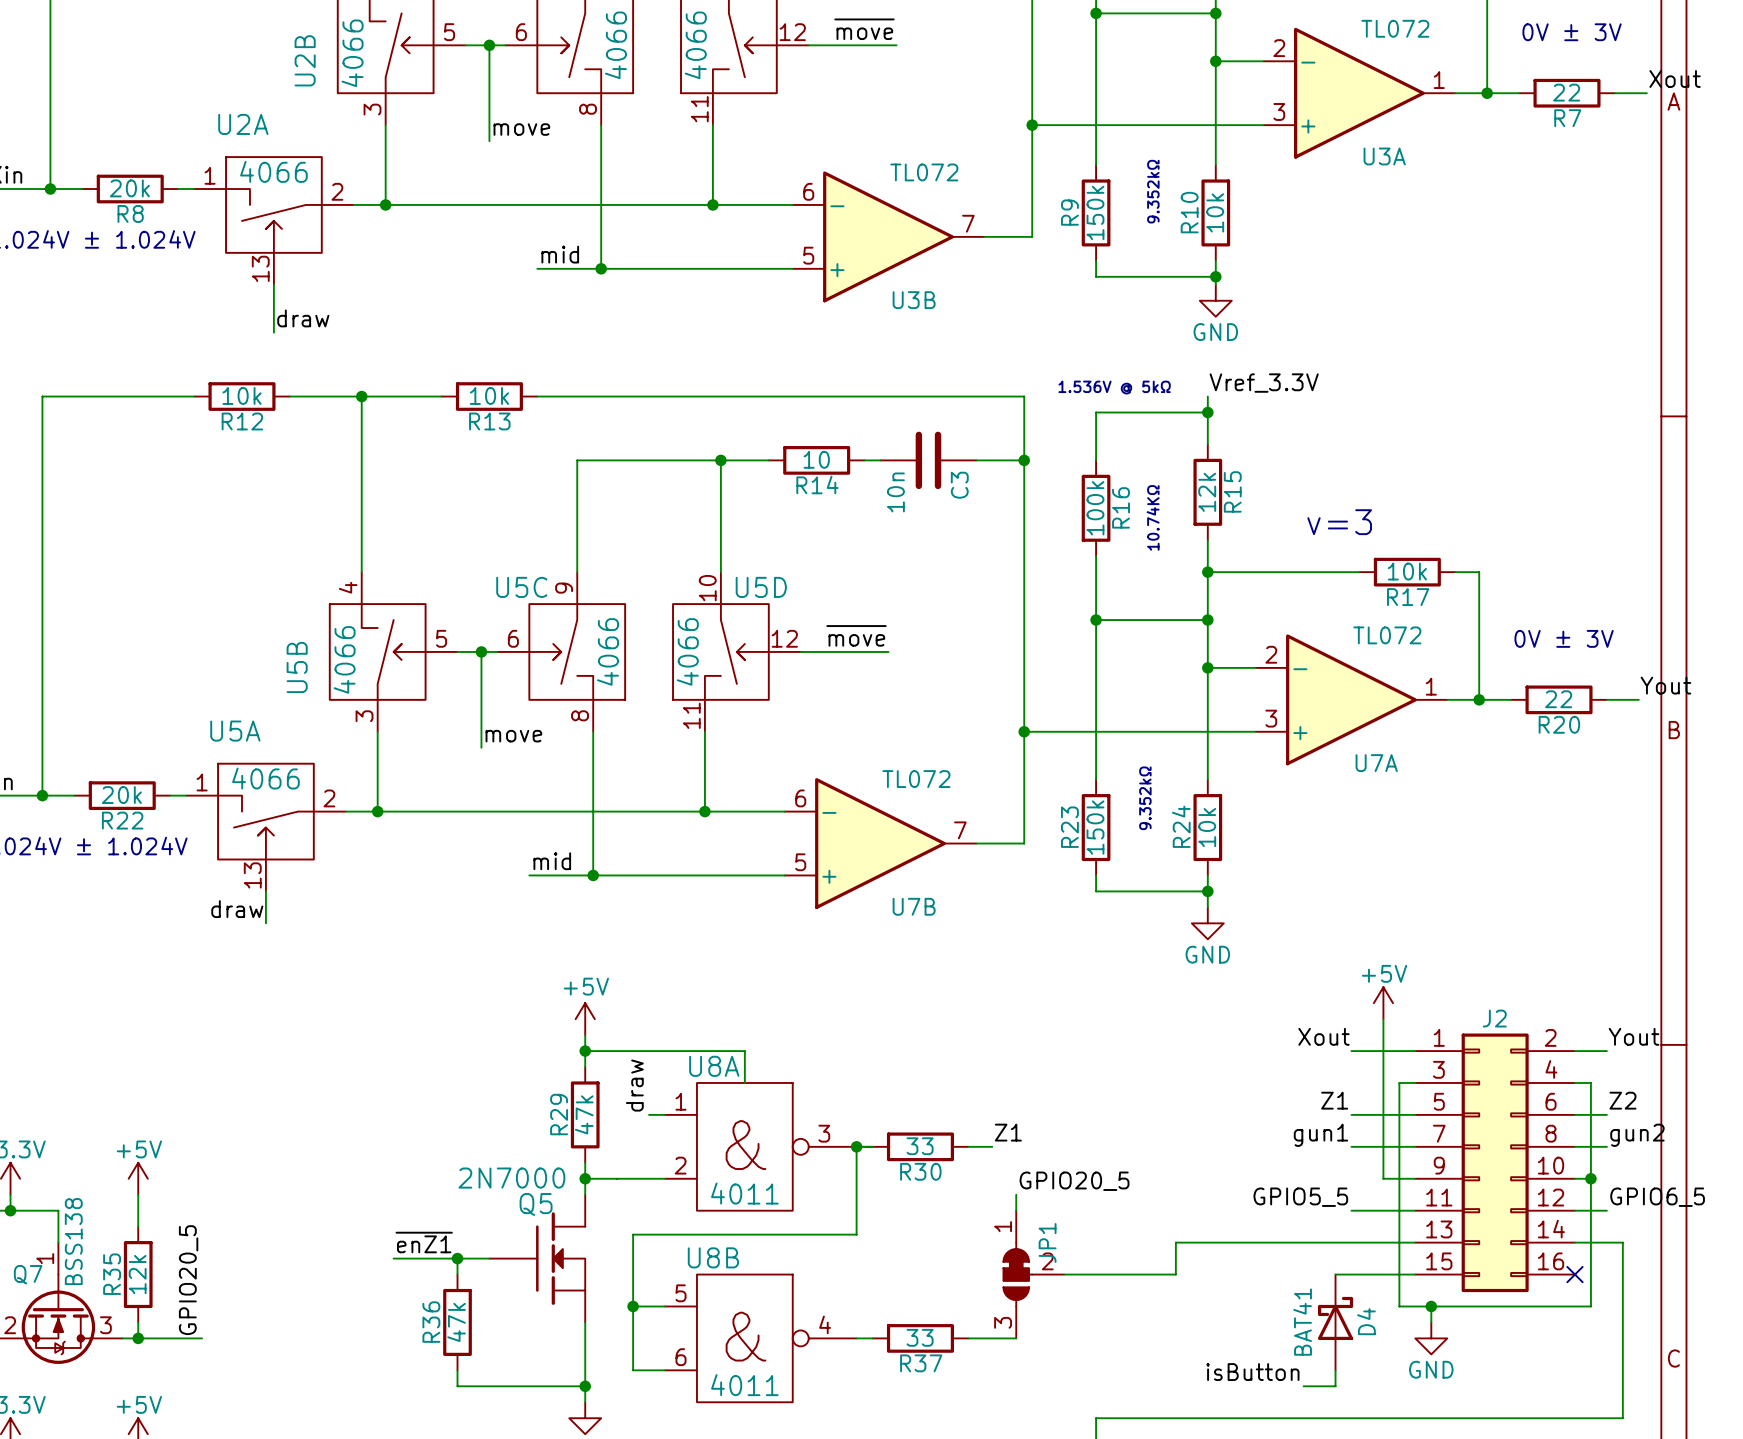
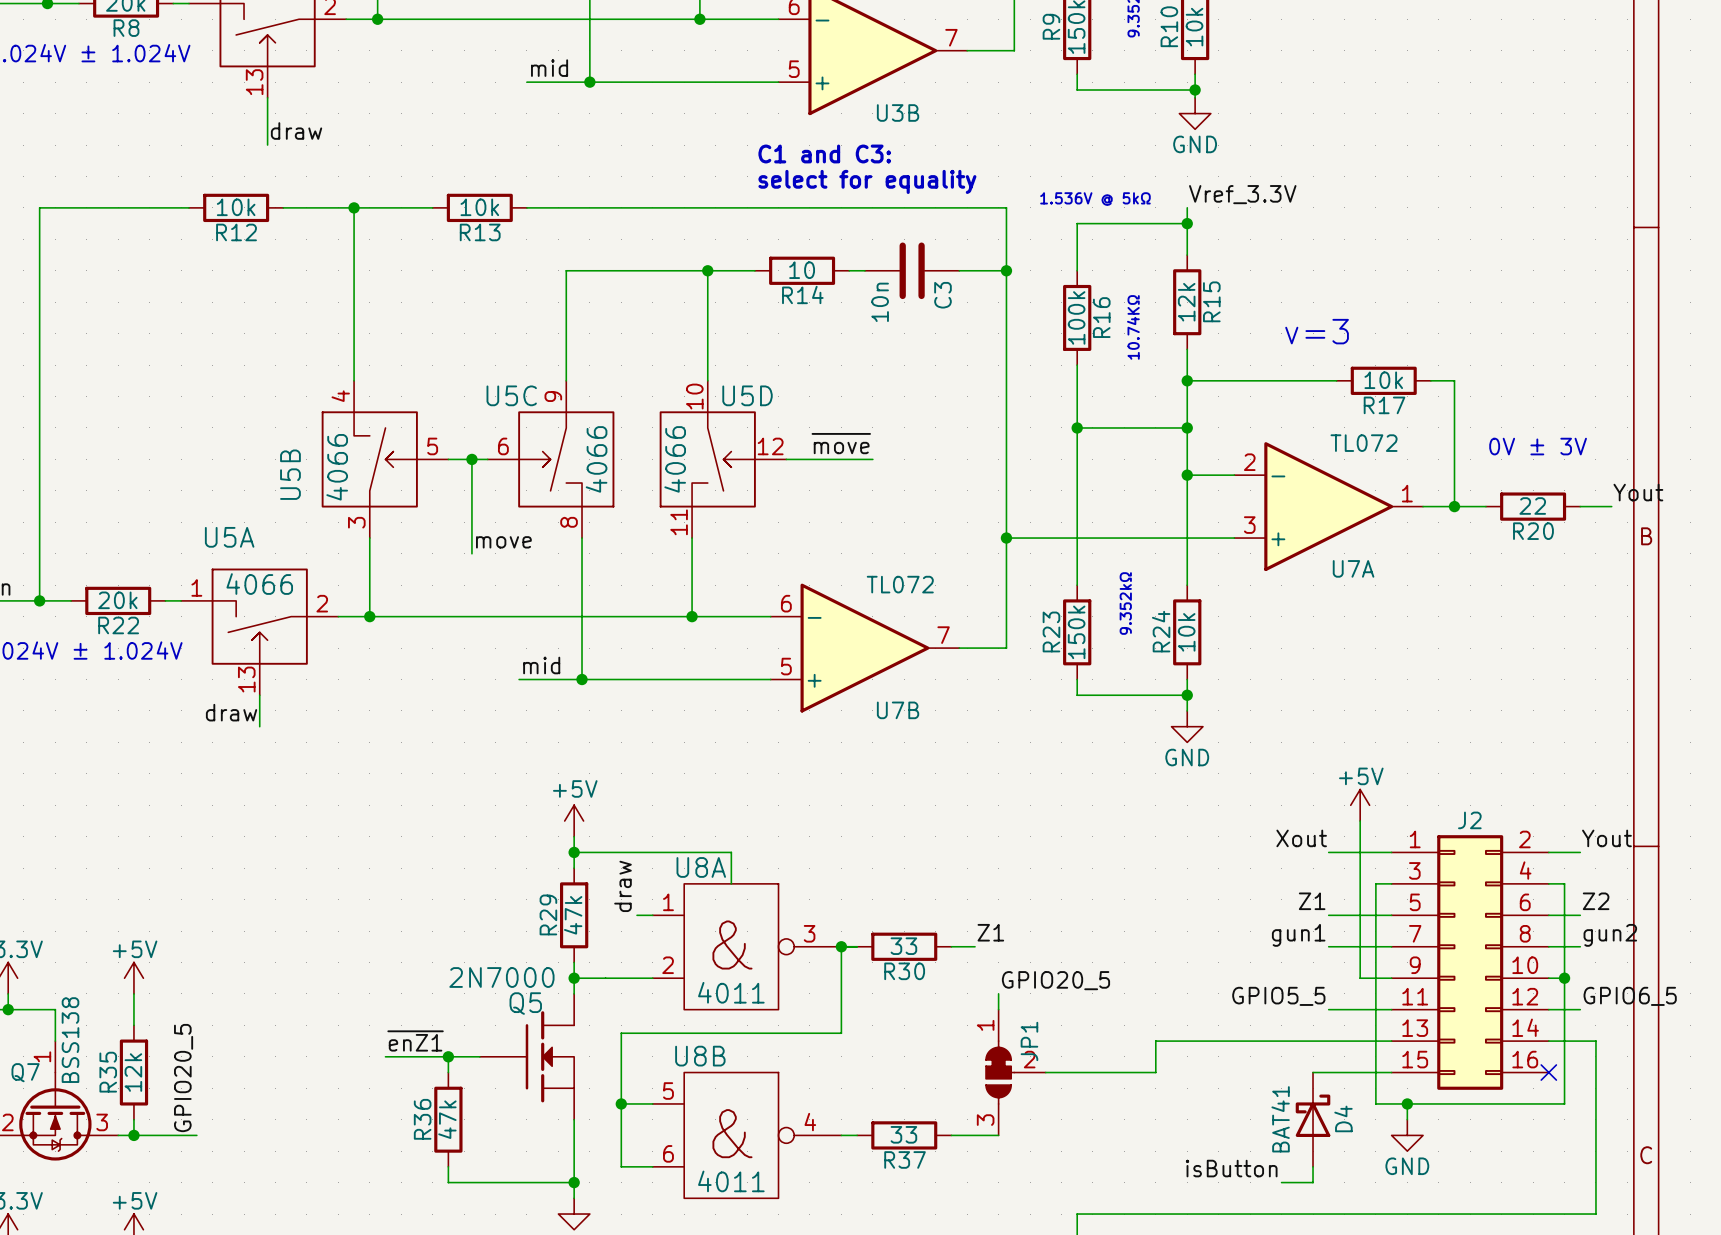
text: none -> C1 and C3: (824, 153)
text: none -> select for equality (867, 181)

